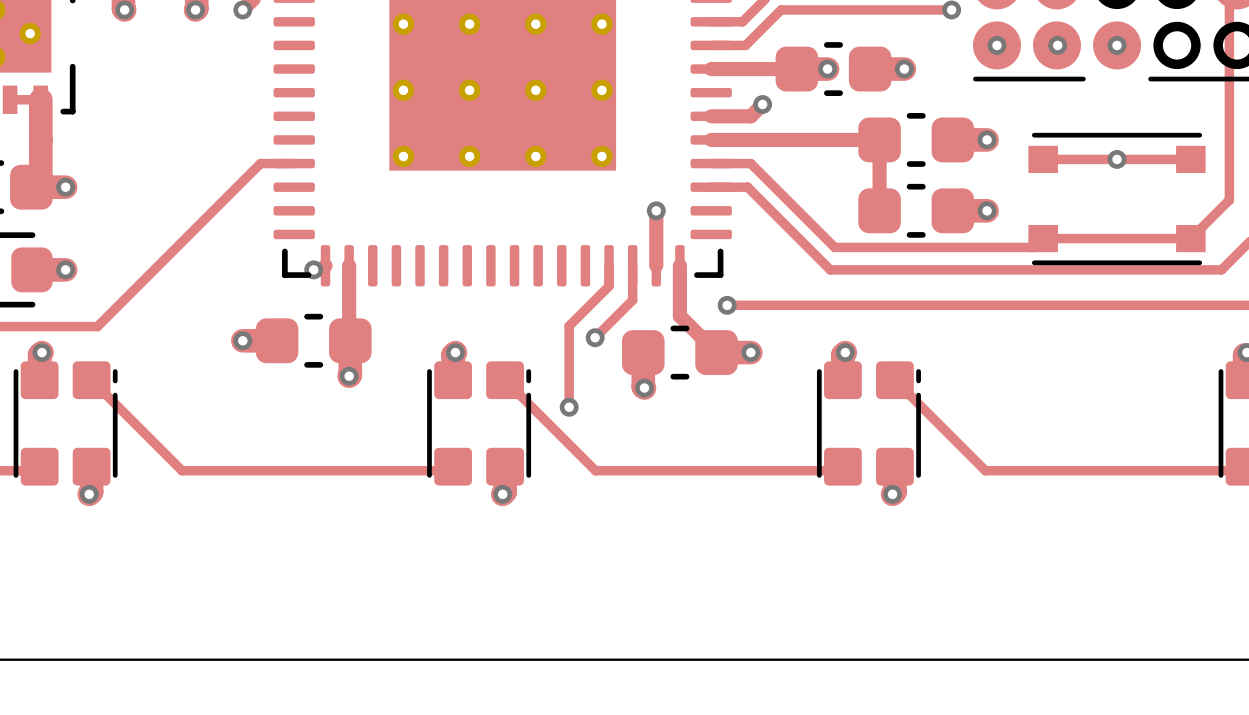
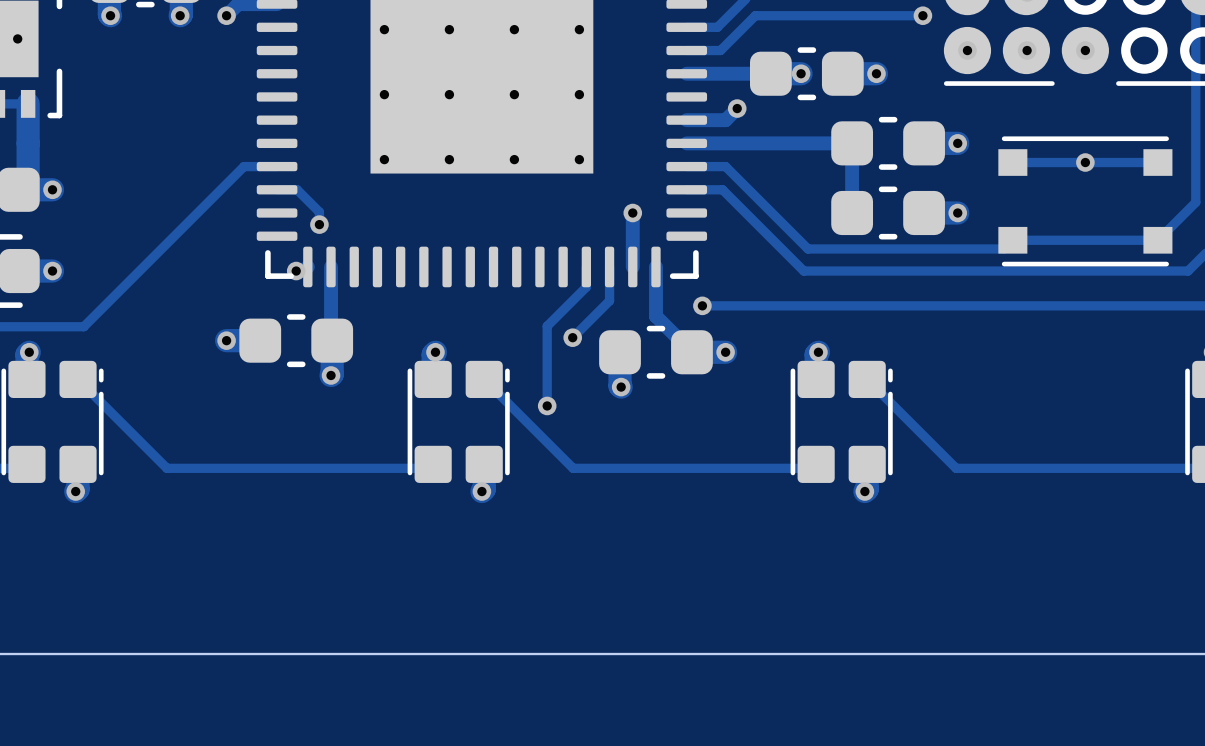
track: none -> (277, 189) (297, 189) (319, 212) (319, 224)
via: none -> (319, 224)

